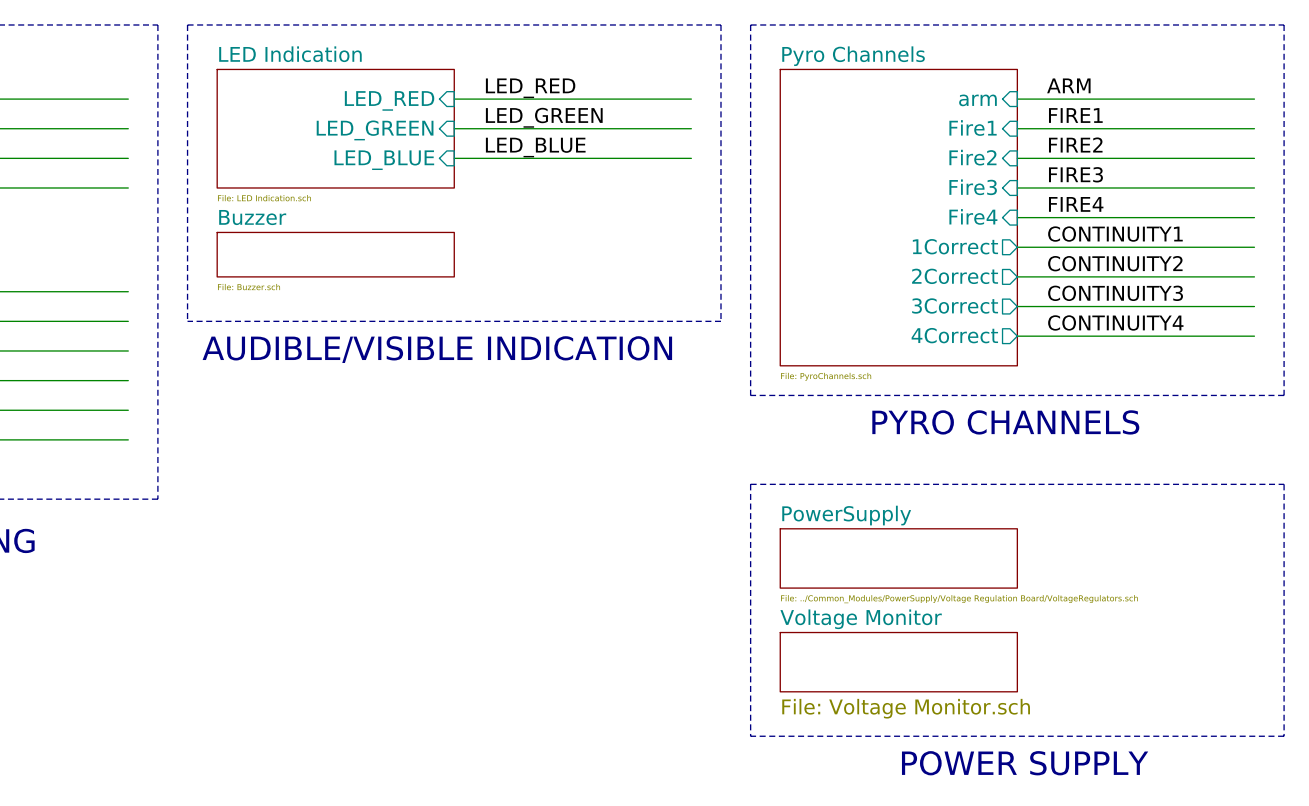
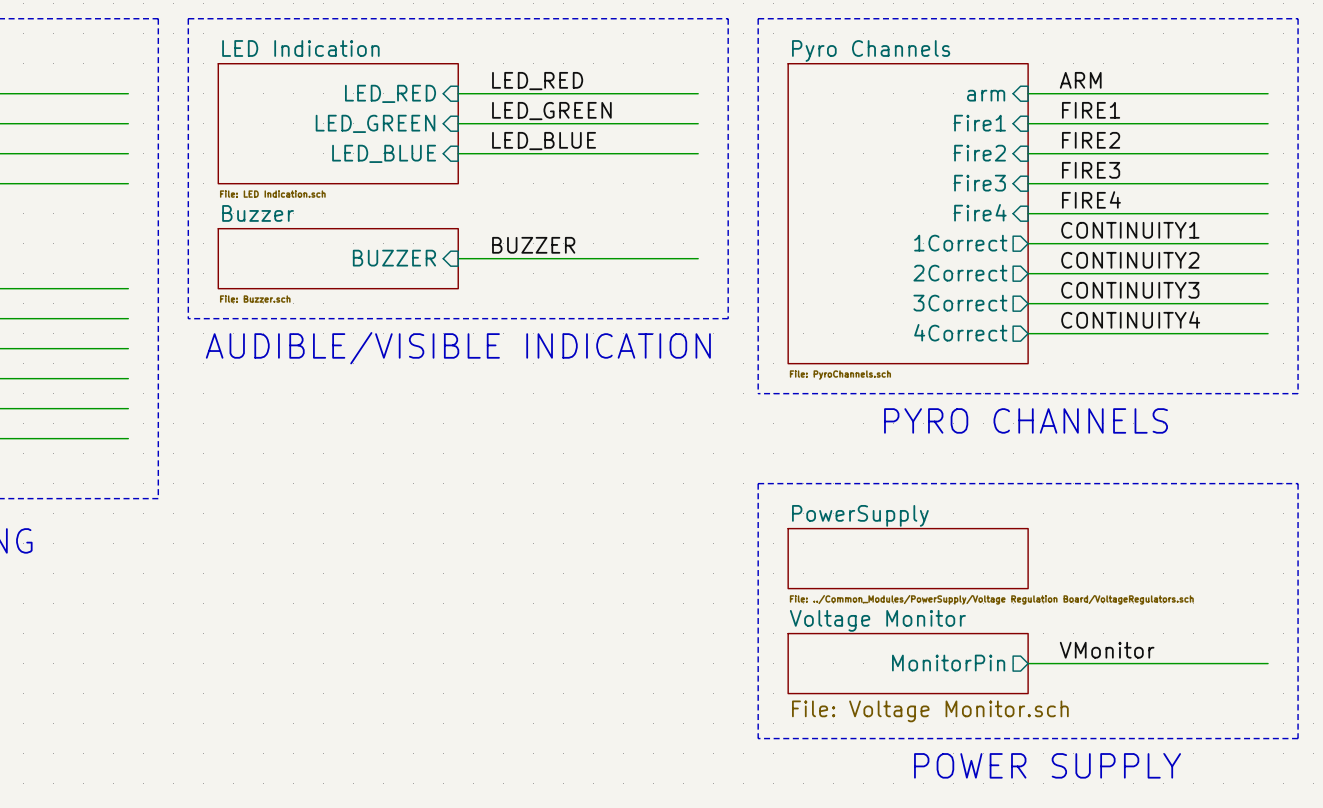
sheet Buzzer shape: [217, 232, 455, 277] -> [218, 228, 459, 289]
label: none -> BUZZER (533, 245)
sheet pin: none -> BUZZER (394, 258)
wire: none -> (458, 258) (698, 258)
label: none -> VMonitor (1107, 650)
sheet pin: none -> MonitorPin (948, 663)
wire: none -> (1028, 663) (1268, 663)

